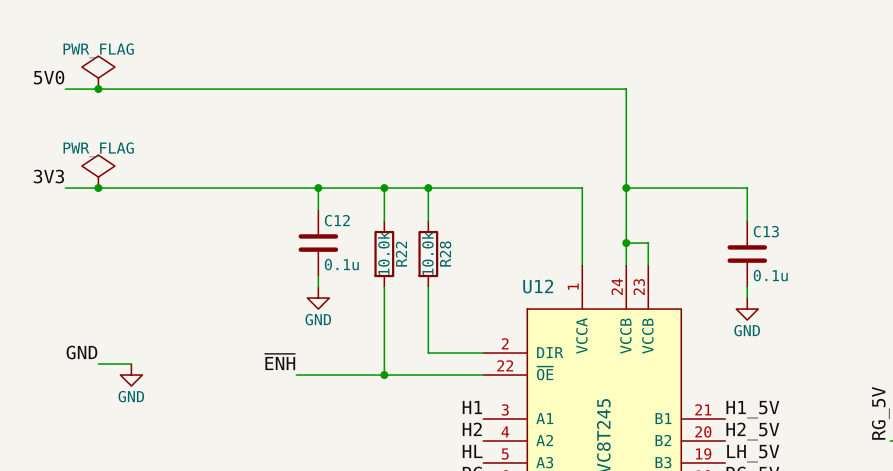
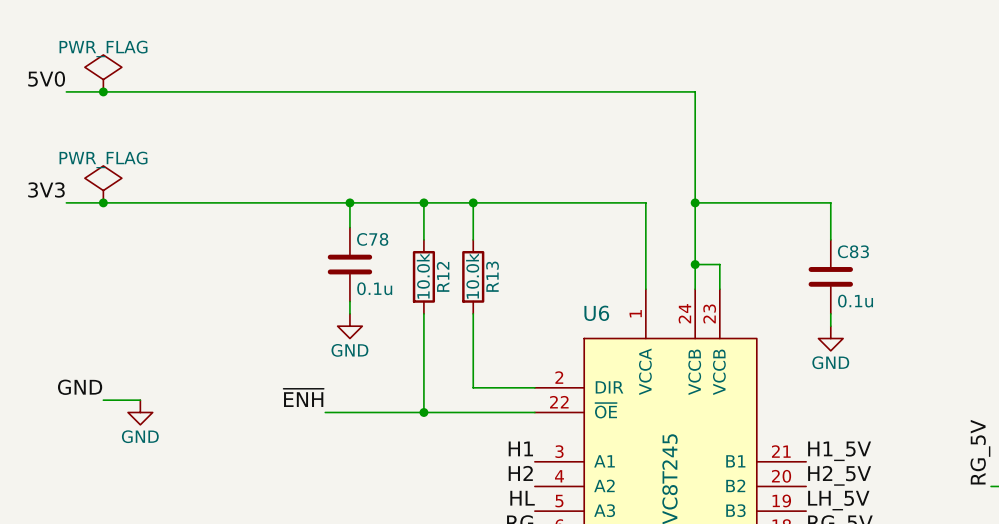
C12 name: C12 (337, 220) -> C78 (372, 239)
C13 name: C13 (766, 231) -> C83 (853, 251)
R28 name: R28 (445, 253) -> R13 (492, 276)
R22 name: R22 (401, 254) -> R12 (443, 276)
U12 name: U12 (538, 286) -> U6 (596, 313)

